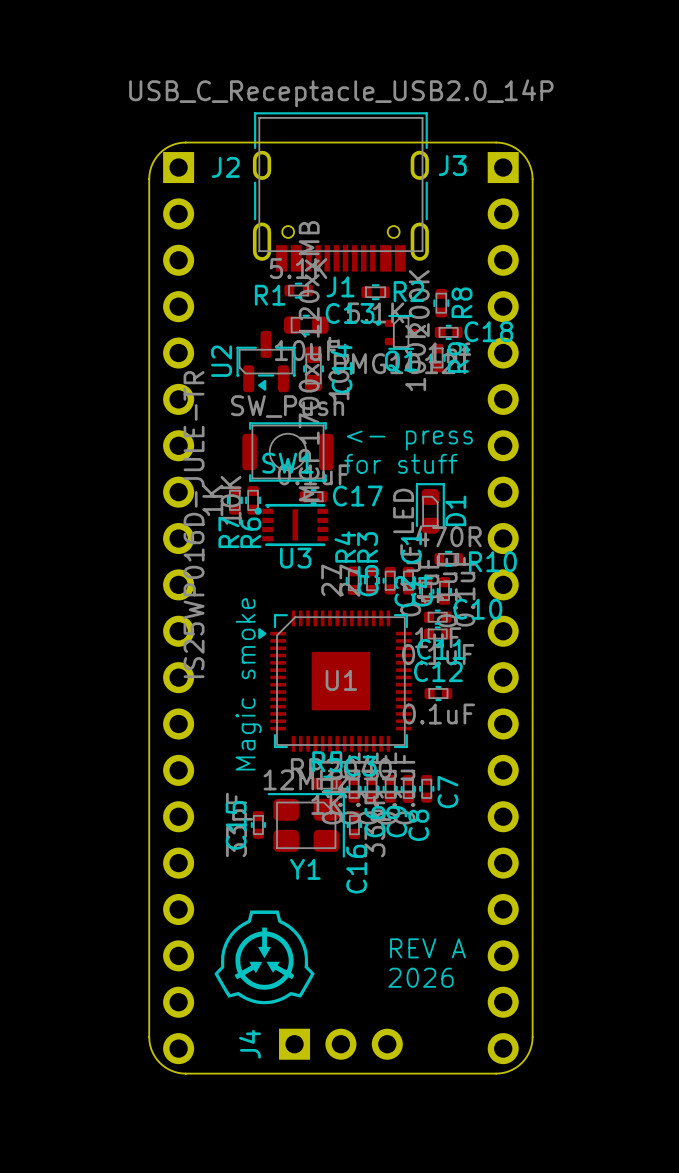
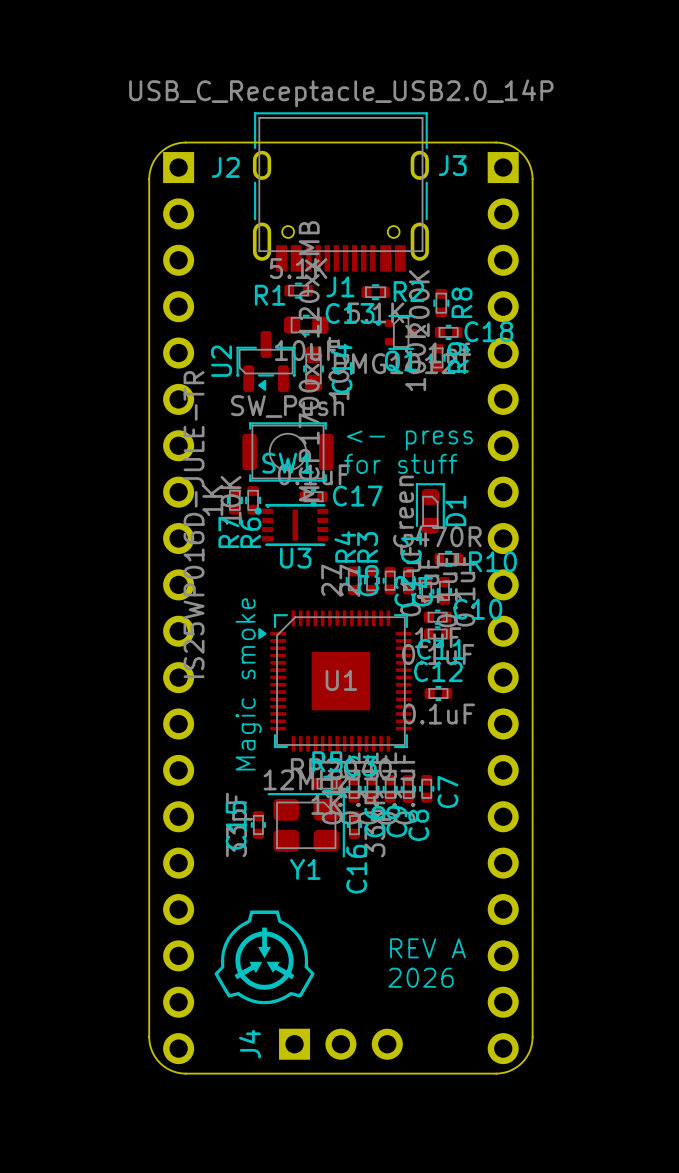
D1 value: LED (403, 510) -> Green (403, 511)

